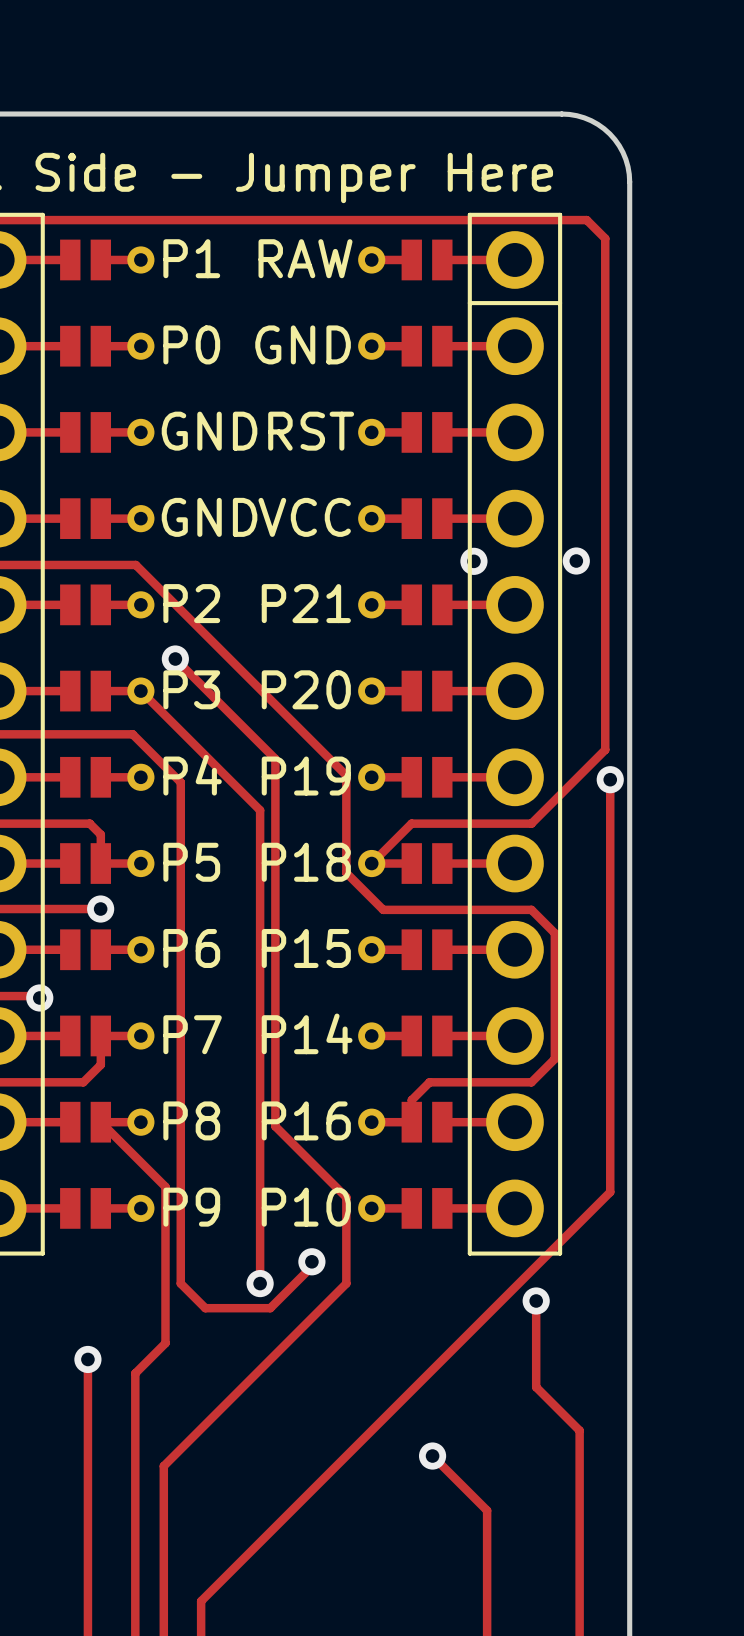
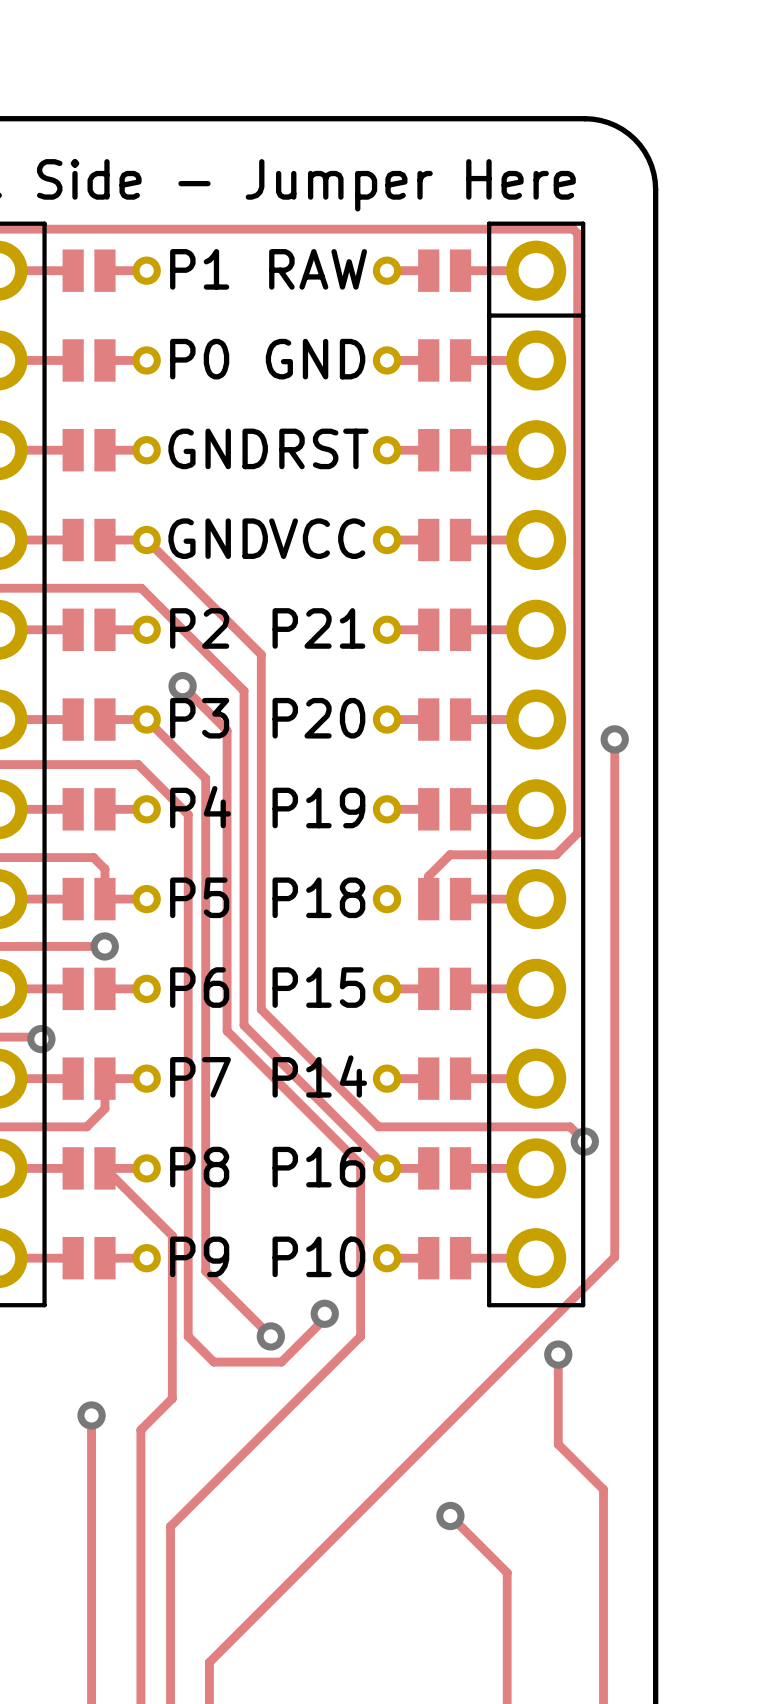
track: (550, 220) (586, 220) (605, 238) (605, 749) (554, 800) -> (573, 229) (577, 233) (577, 833)
via: (473, 561) -> none
via: (576, 561) -> none
track: (234, 663) (346, 775) (346, 872) (383, 909) (531, 909) (554, 933) (554, 1058) (531, 1082) -> (244, 690) (244, 1025) (387, 1168)
track: (218, 701) (275, 759) (275, 1126) (346, 1197) -> (227, 730) (227, 1030) (360, 1164) (360, 1246)
track: (197, 747) (260, 810) (260, 1283) -> (205, 778) (205, 1271) (270, 1336)
track: (610, 779) (610, 1192) (201, 1601) -> (614, 739) (614, 1257) (209, 1662) (209, 1667)
via position: (610, 779) -> (614, 739)
track: (534, 820) (531, 823) (411, 823) (371, 863) (411, 863) -> (556, 854) (450, 854) (428, 876) (428, 899)
track: (429, 1082) (411, 1100) (411, 1122) -> (447, 1126) (378, 1126) (261, 1009) (261, 654) (146, 540)
track: none -> (553, 1126) (570, 1126) (584, 1141)
via: none -> (584, 1141)

